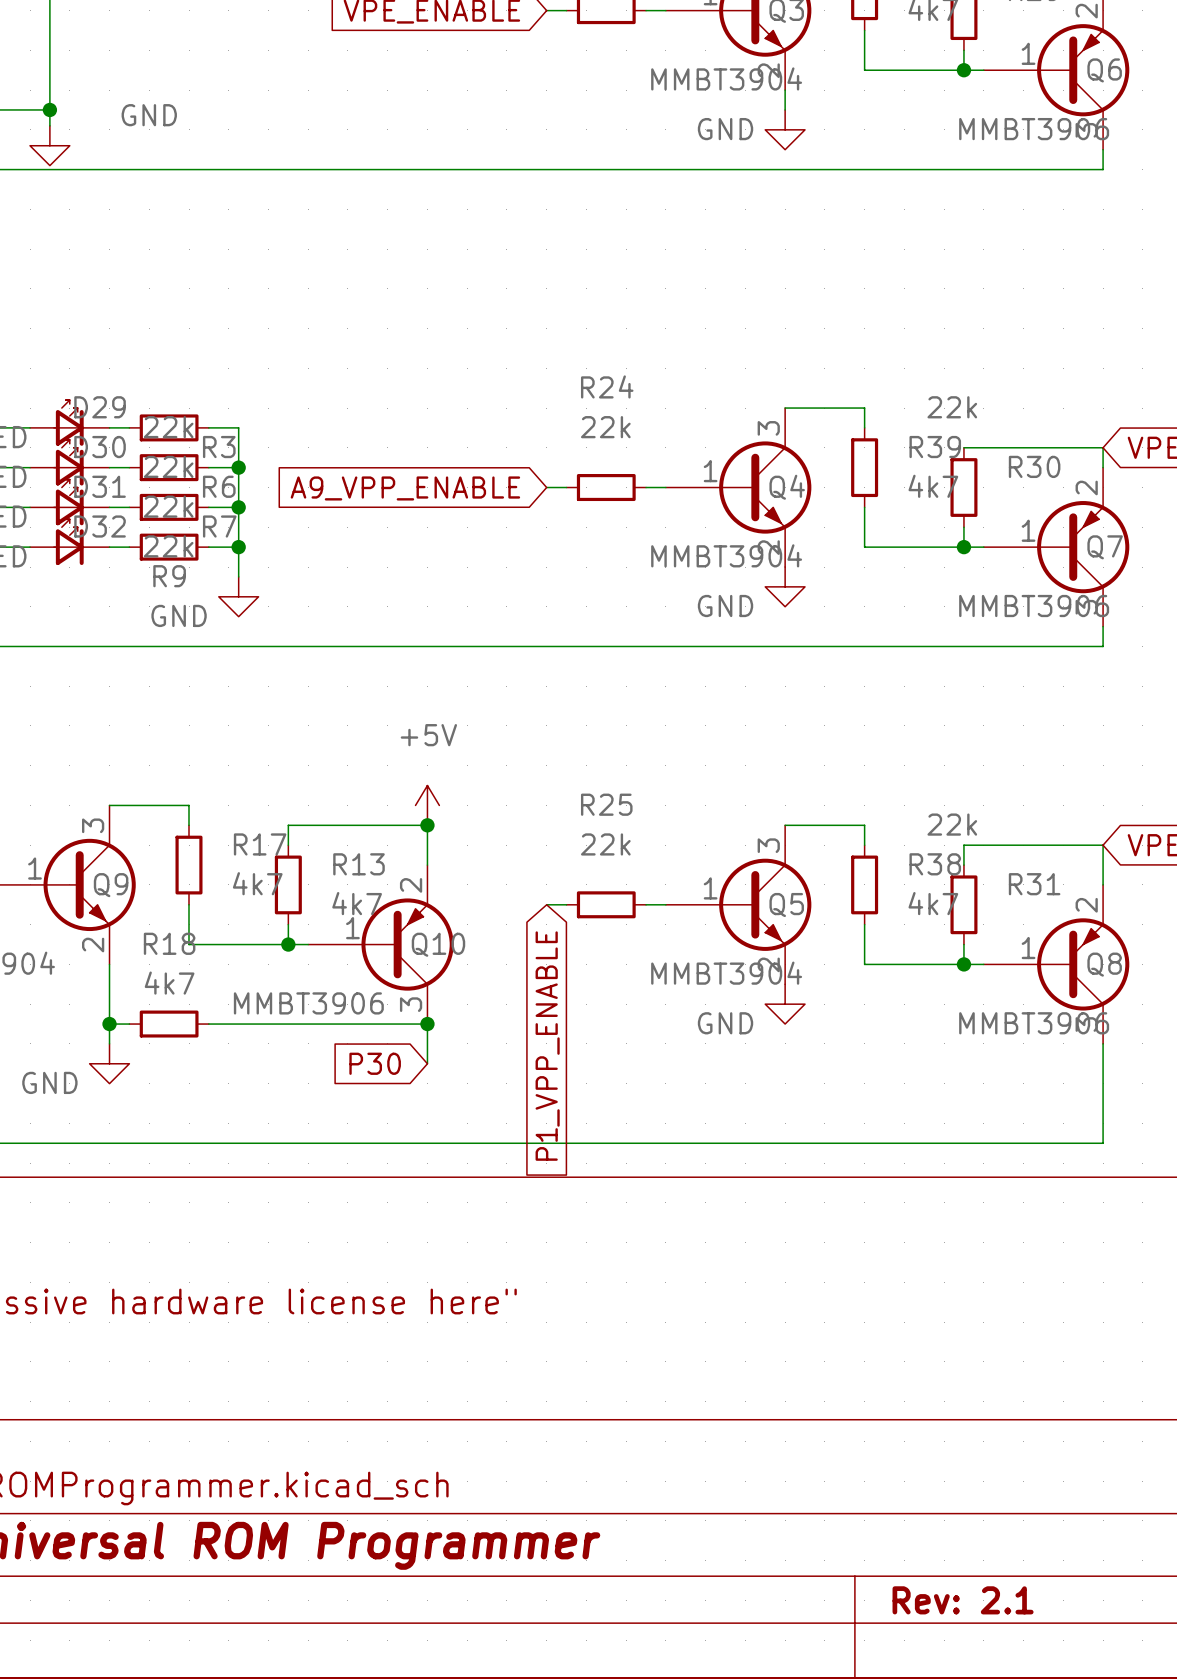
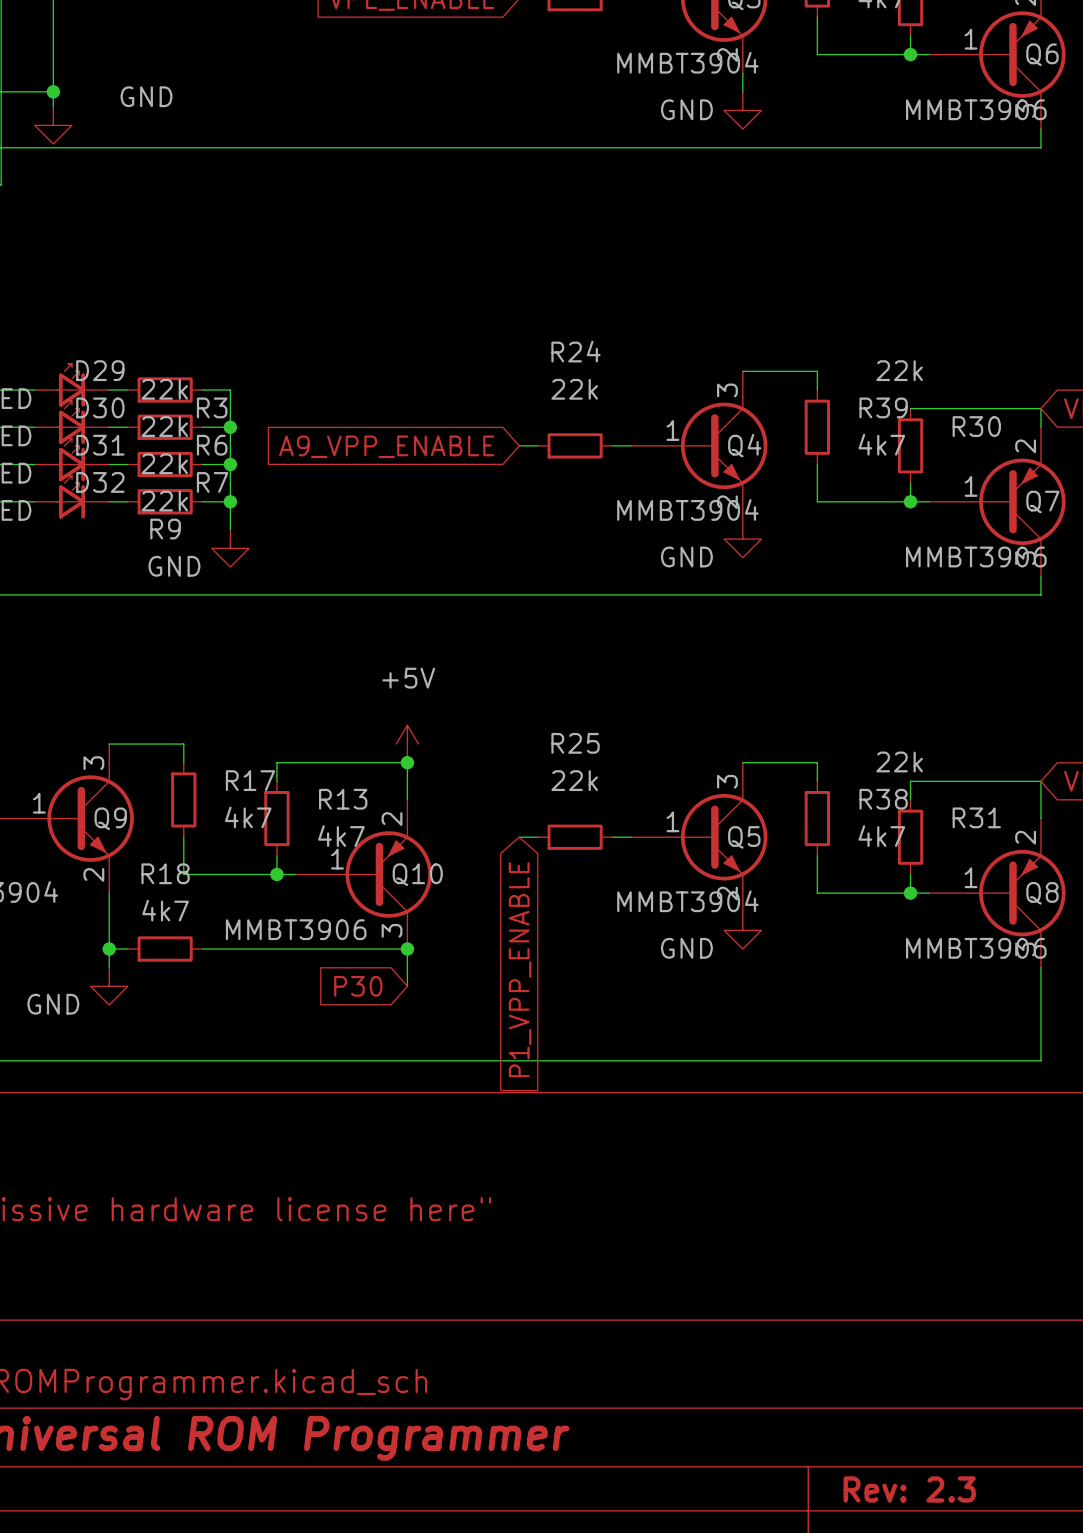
title block: Rev: 2.1 (963, 1600) -> Rev: 2.3 (909, 1489)

